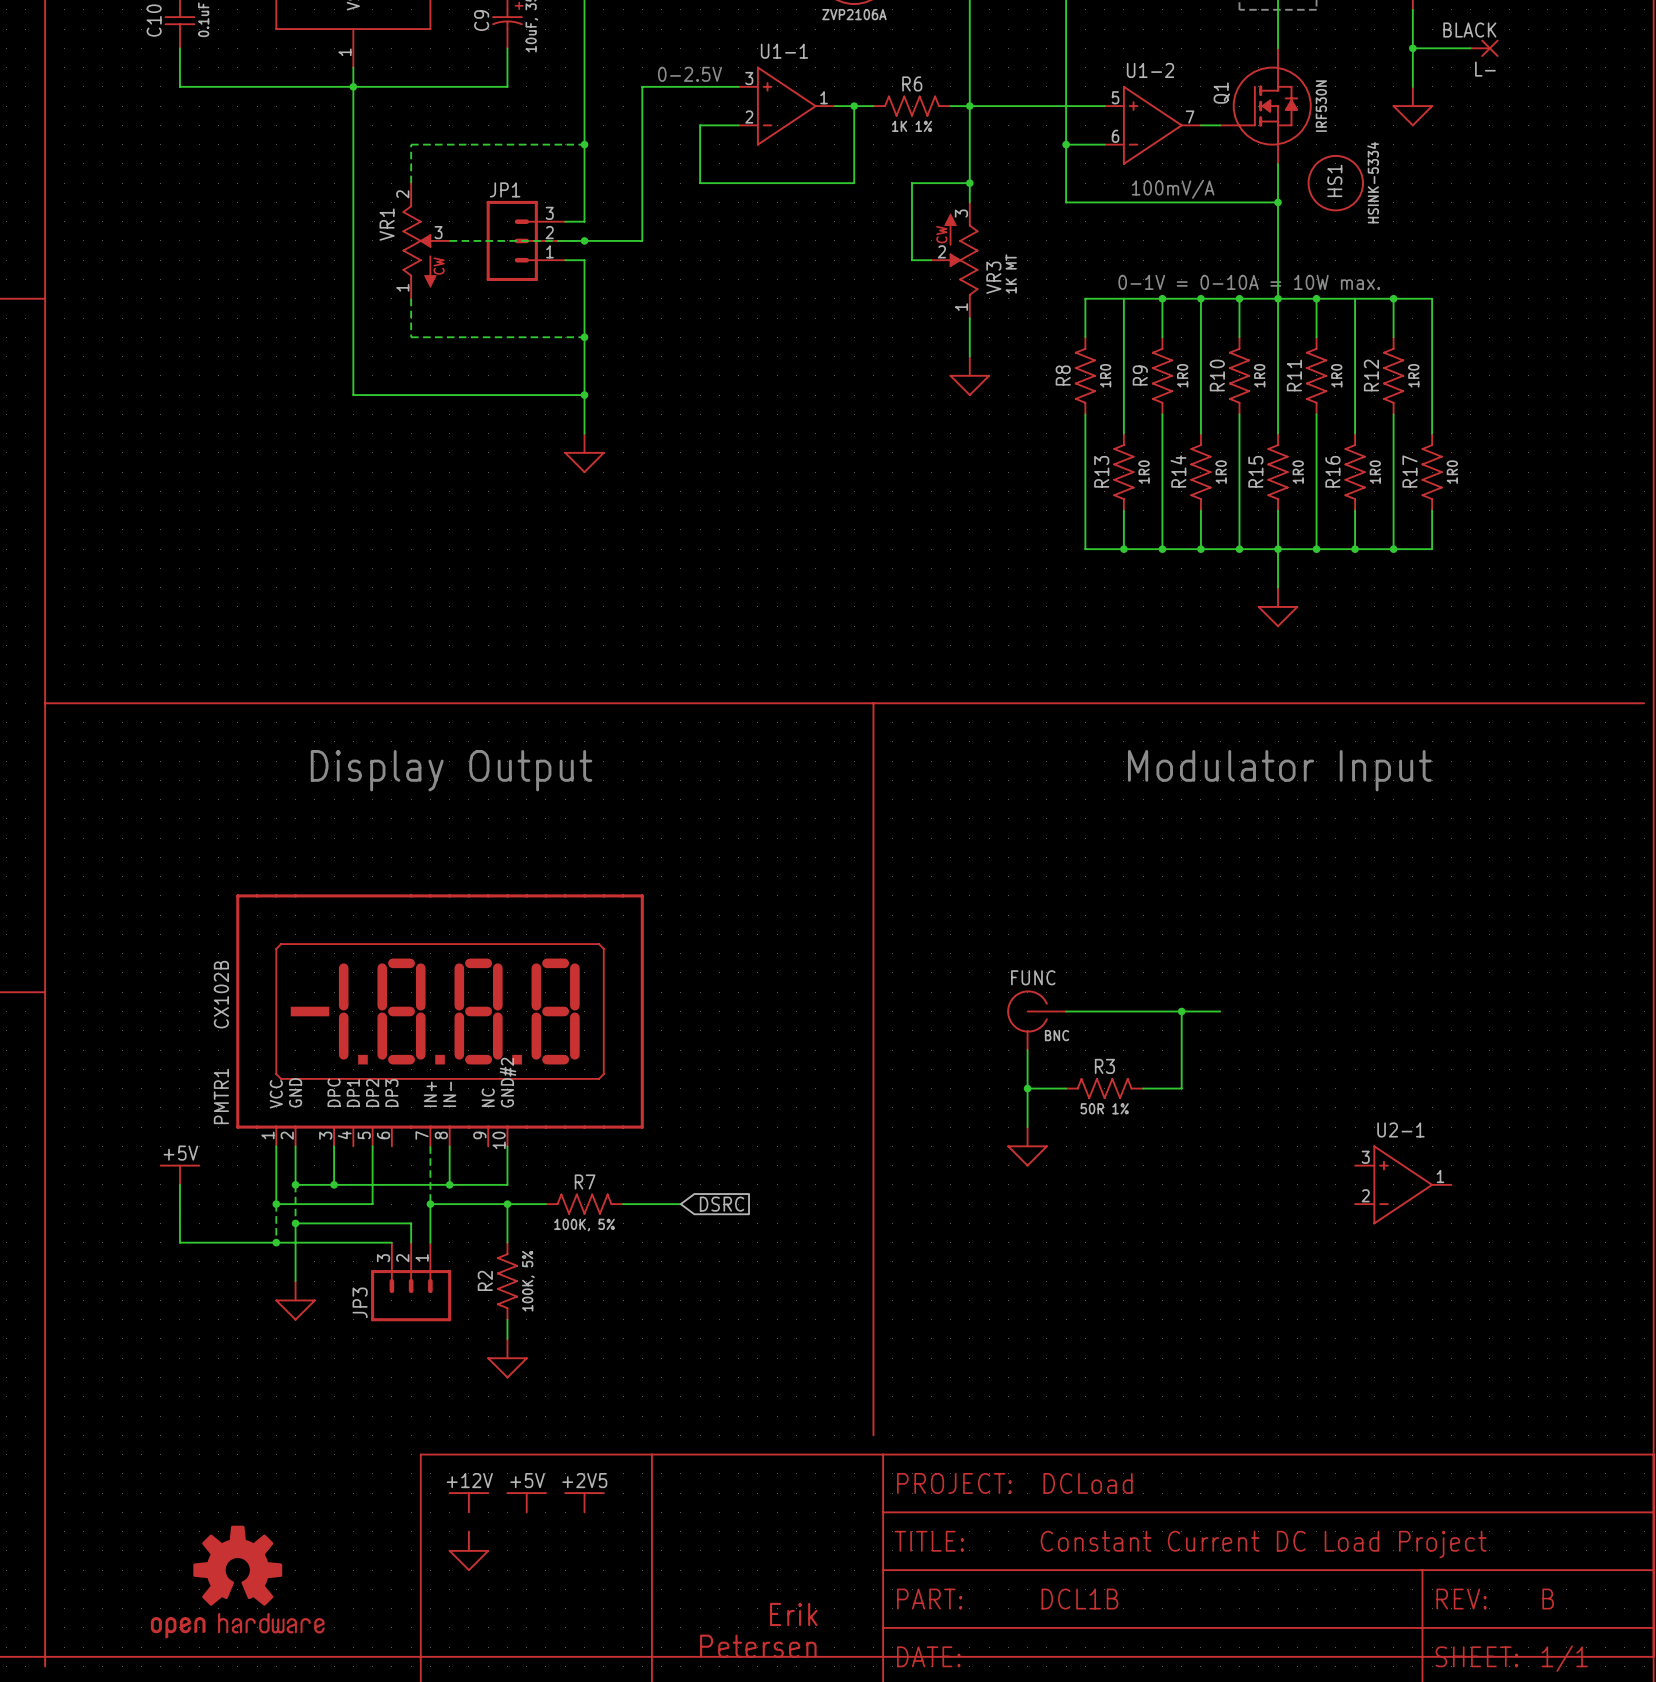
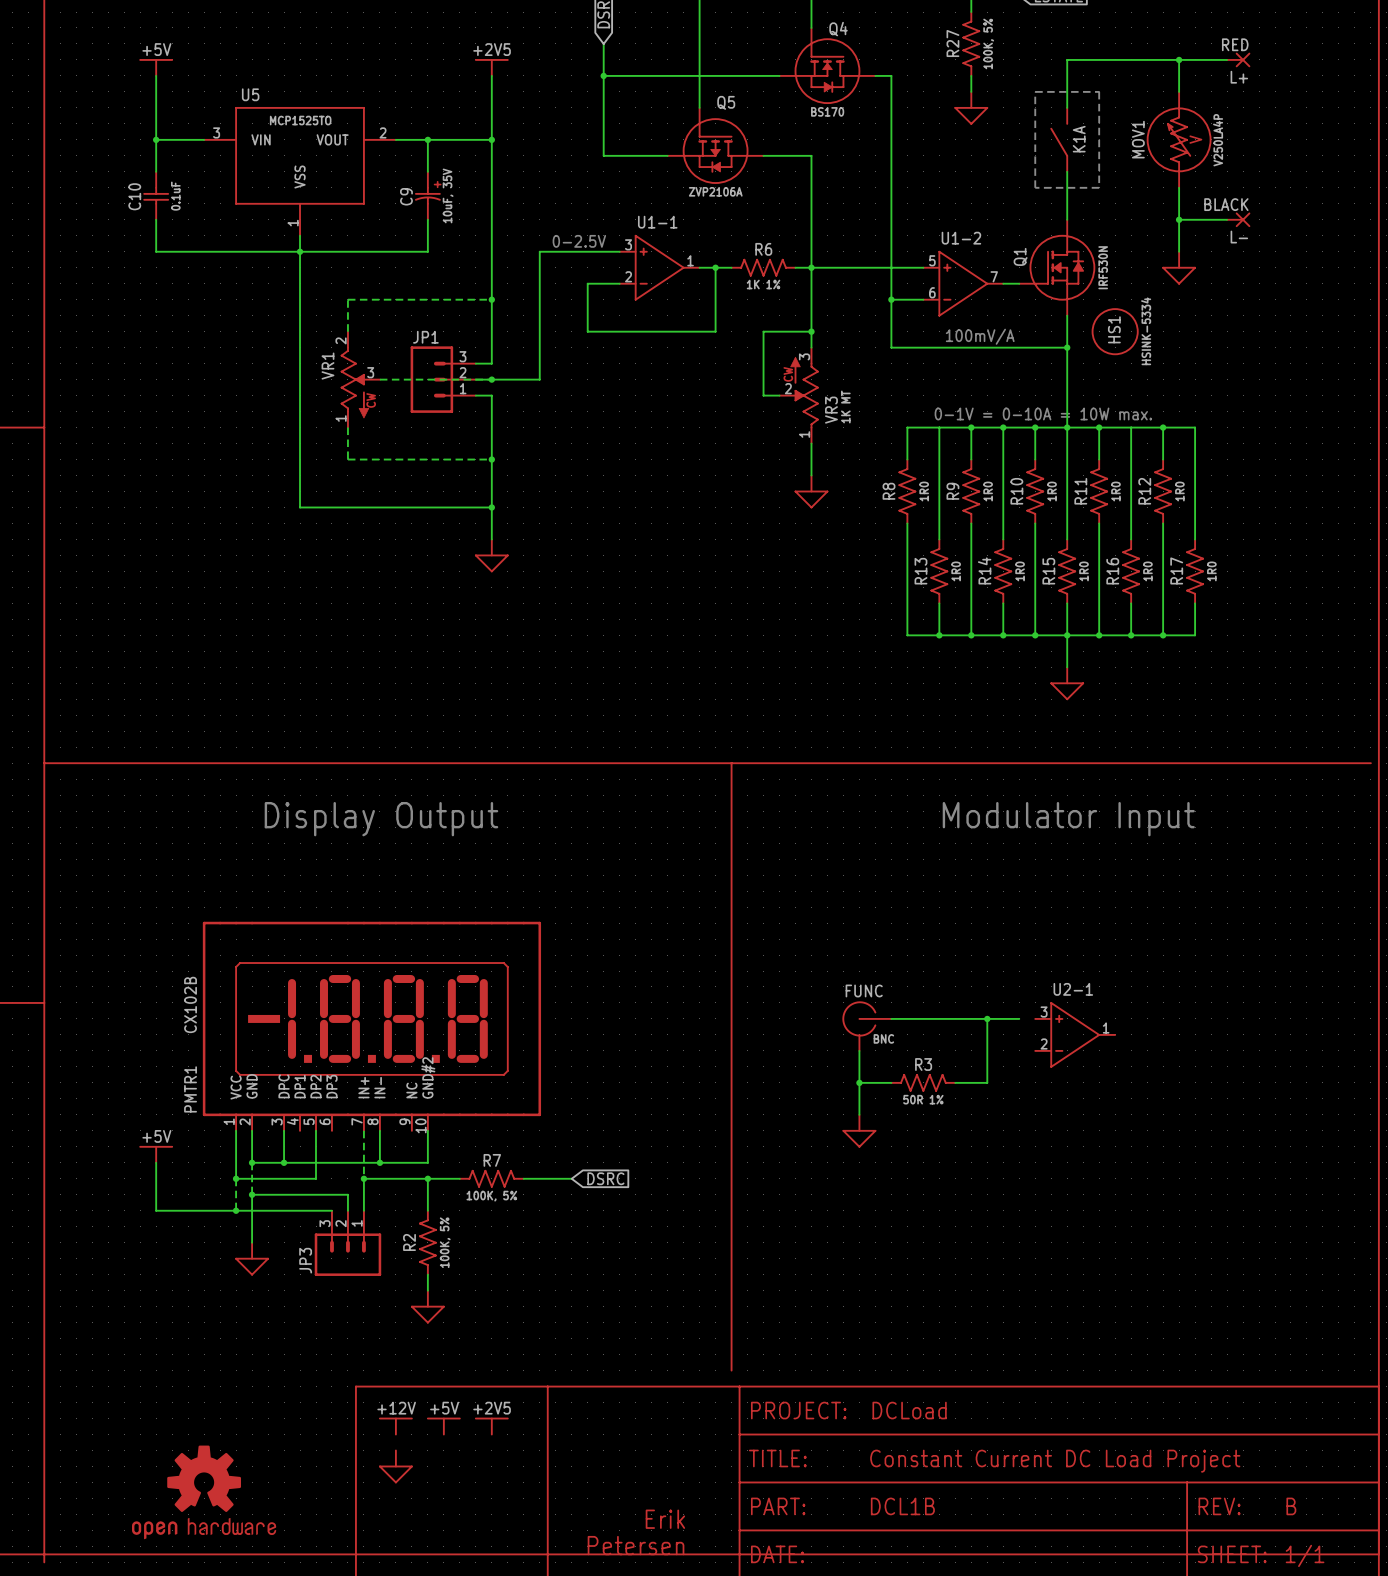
U2-1 position: (1403, 1184) -> (1075, 1034)

